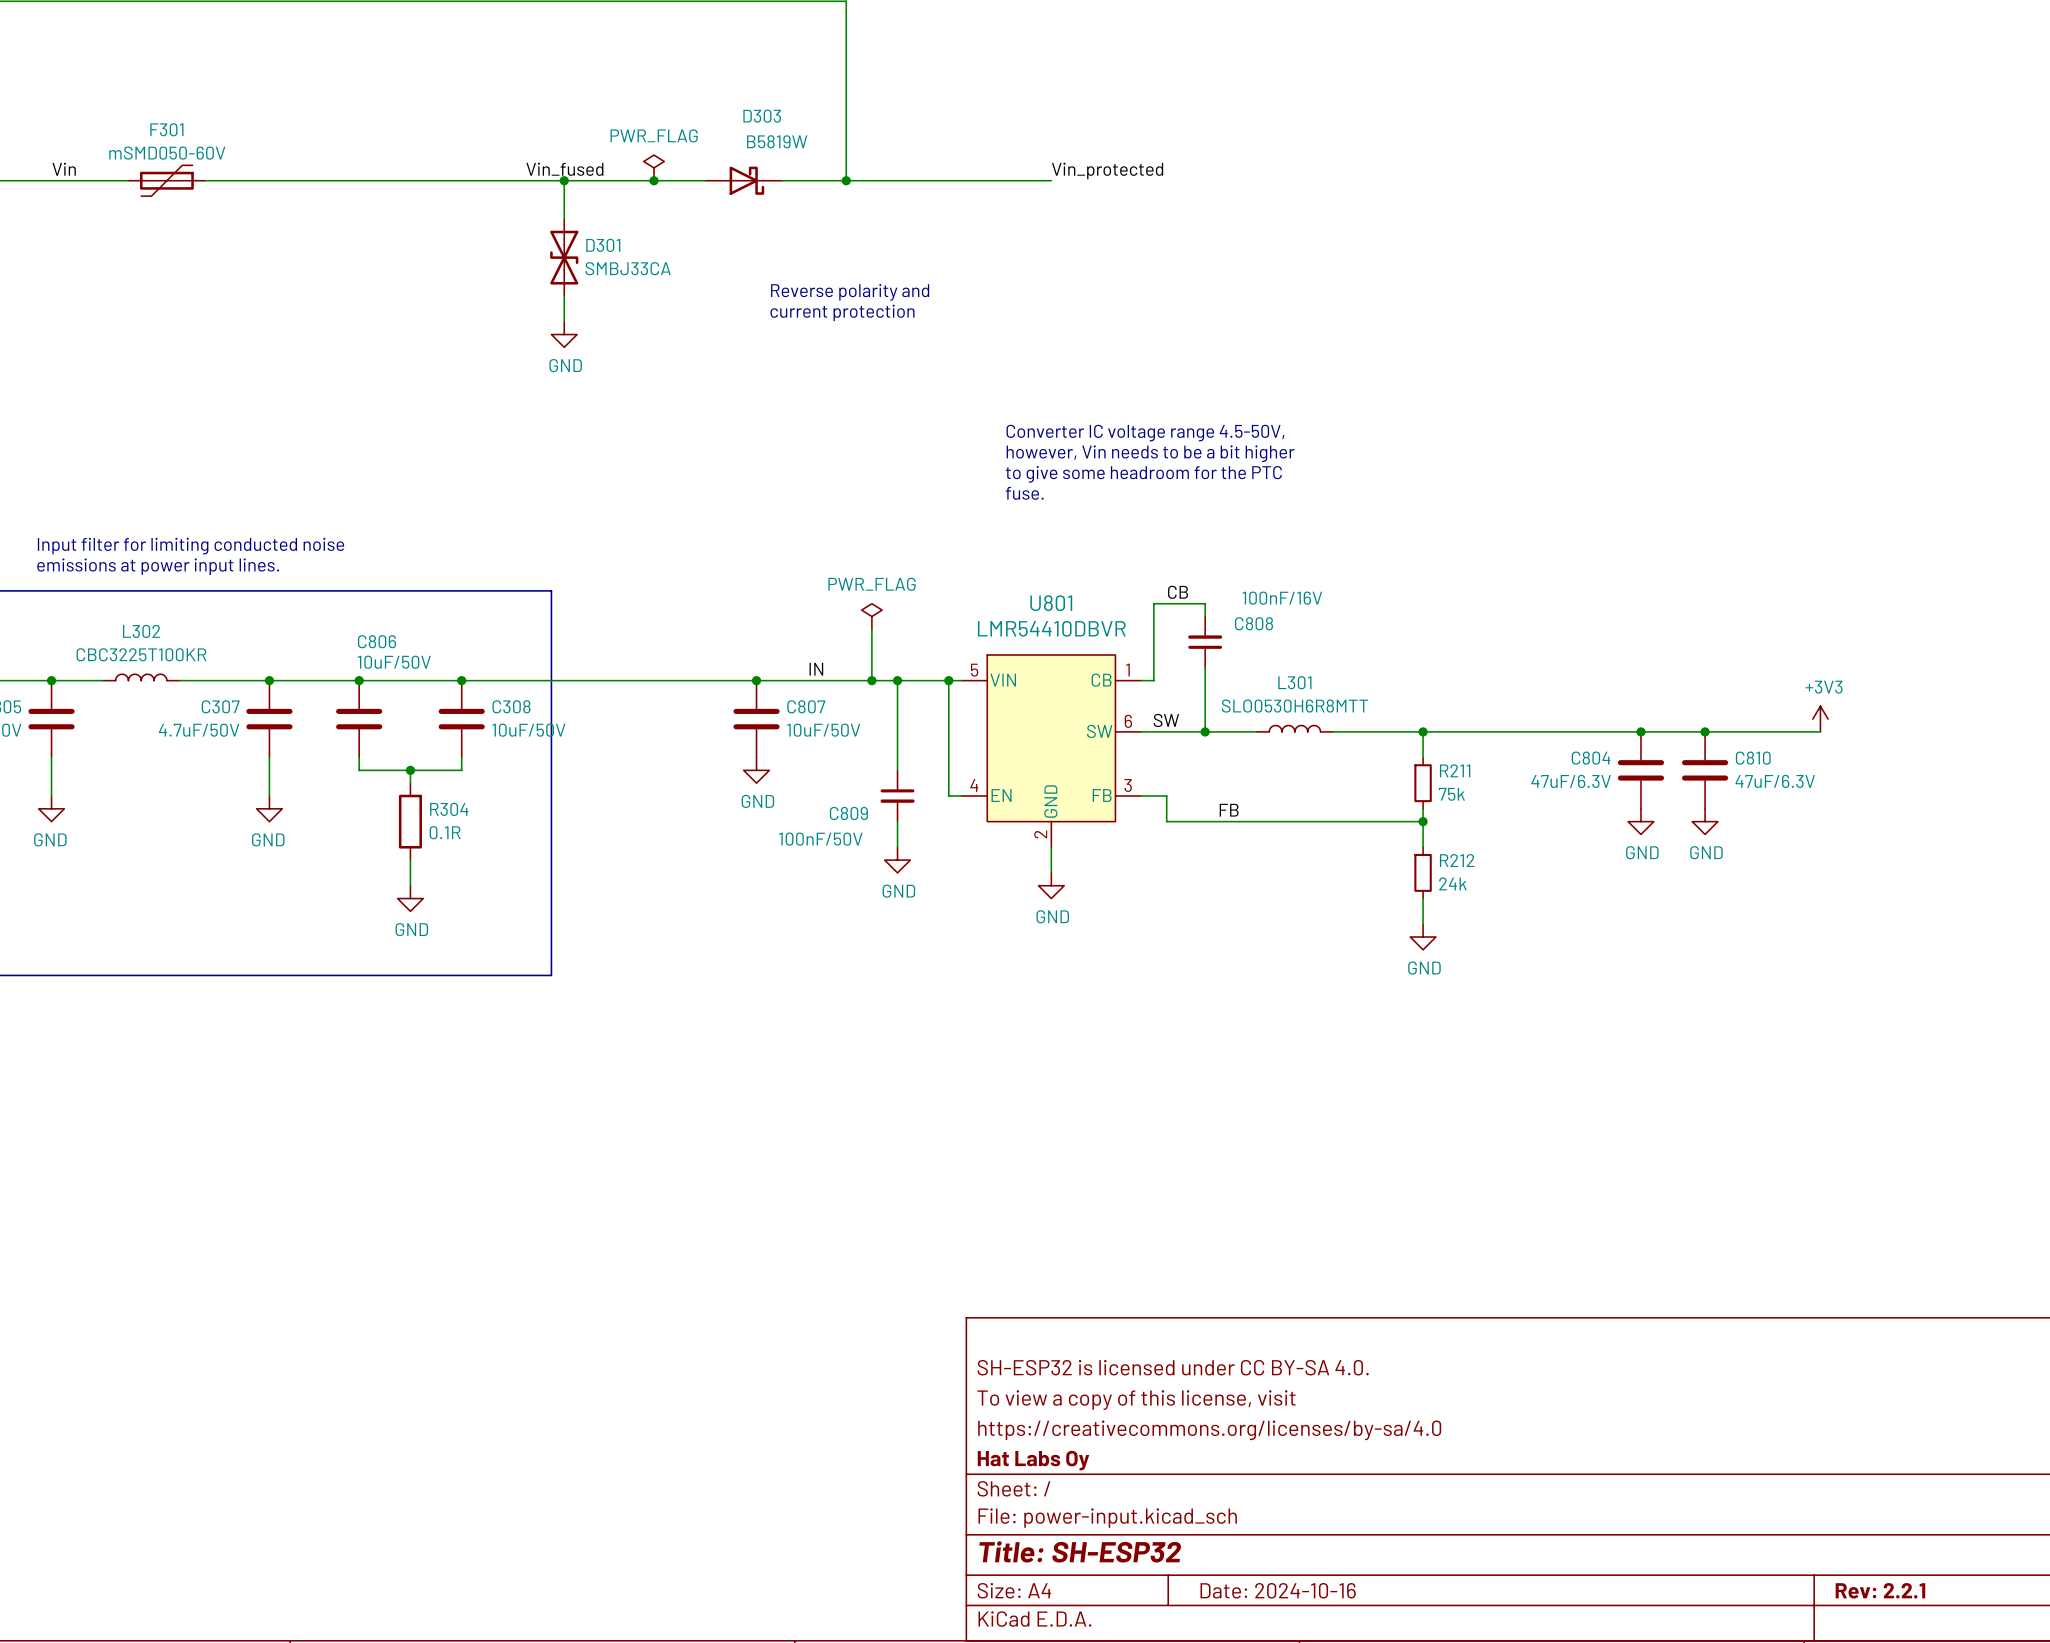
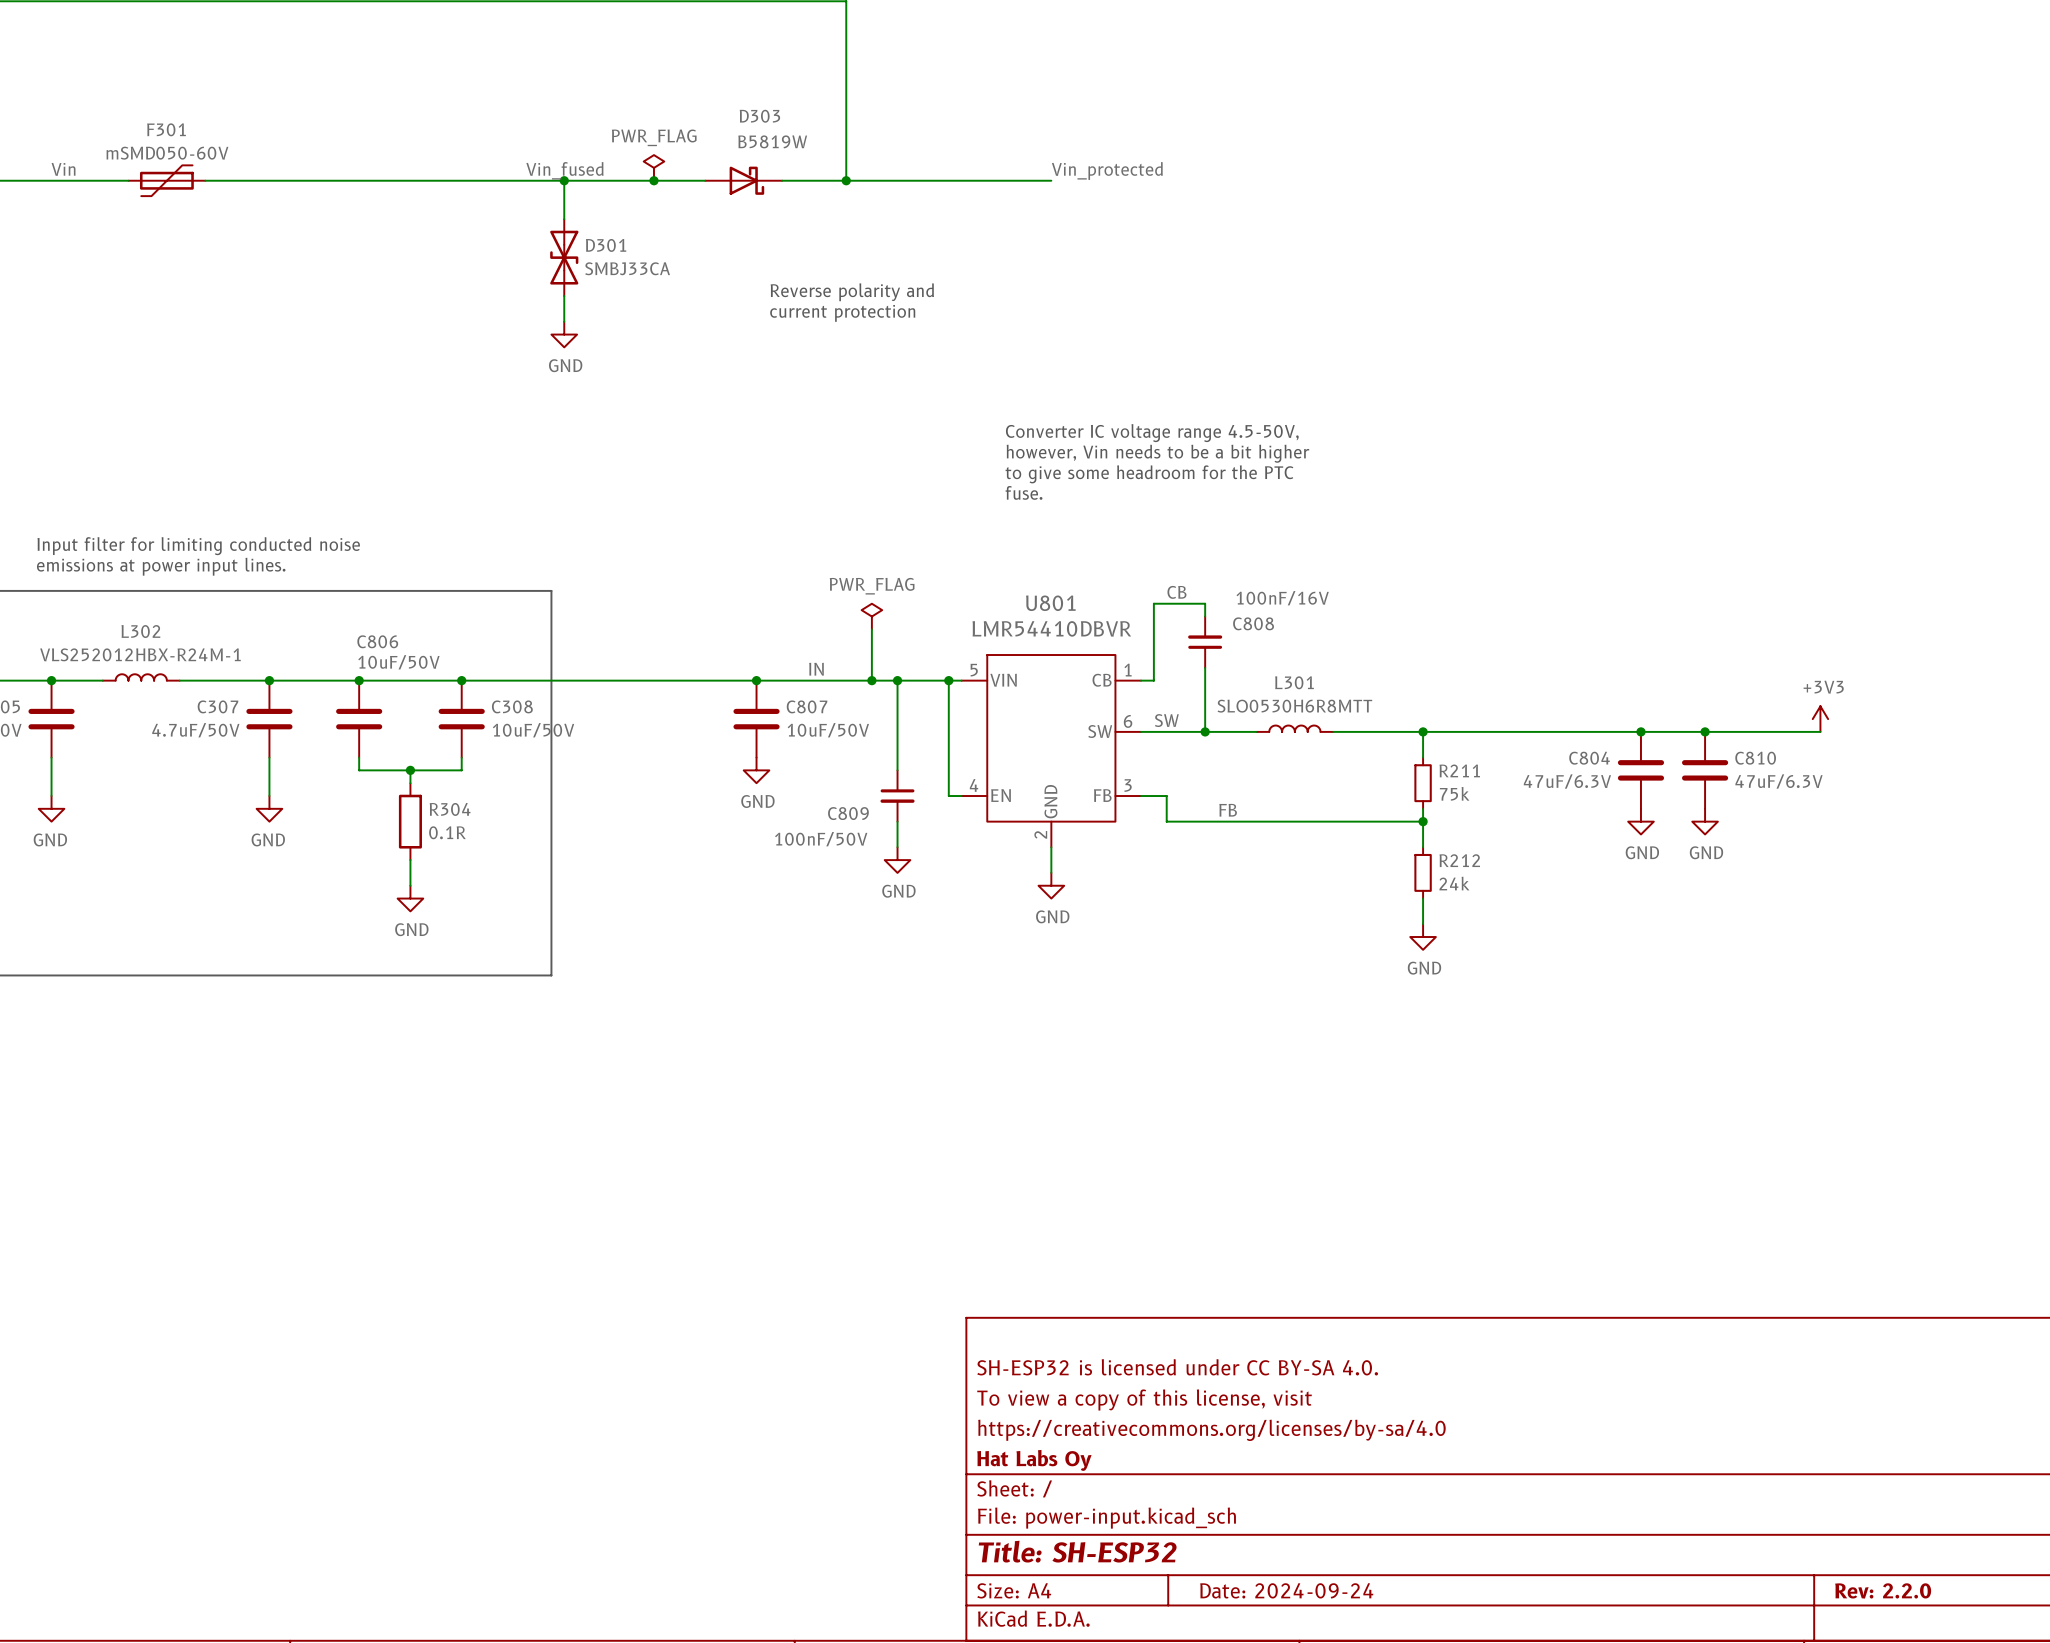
L302 value: CBC3225T100KR (141, 654) -> VLS252012HBX-R24M-1 (140, 654)
title block: Date: 2024-10-16 (1278, 1590) -> Date: 2024-09-24 (1286, 1590)
title block: Rev: 2.2.1 (1880, 1590) -> Rev: 2.2.0 (1883, 1590)

